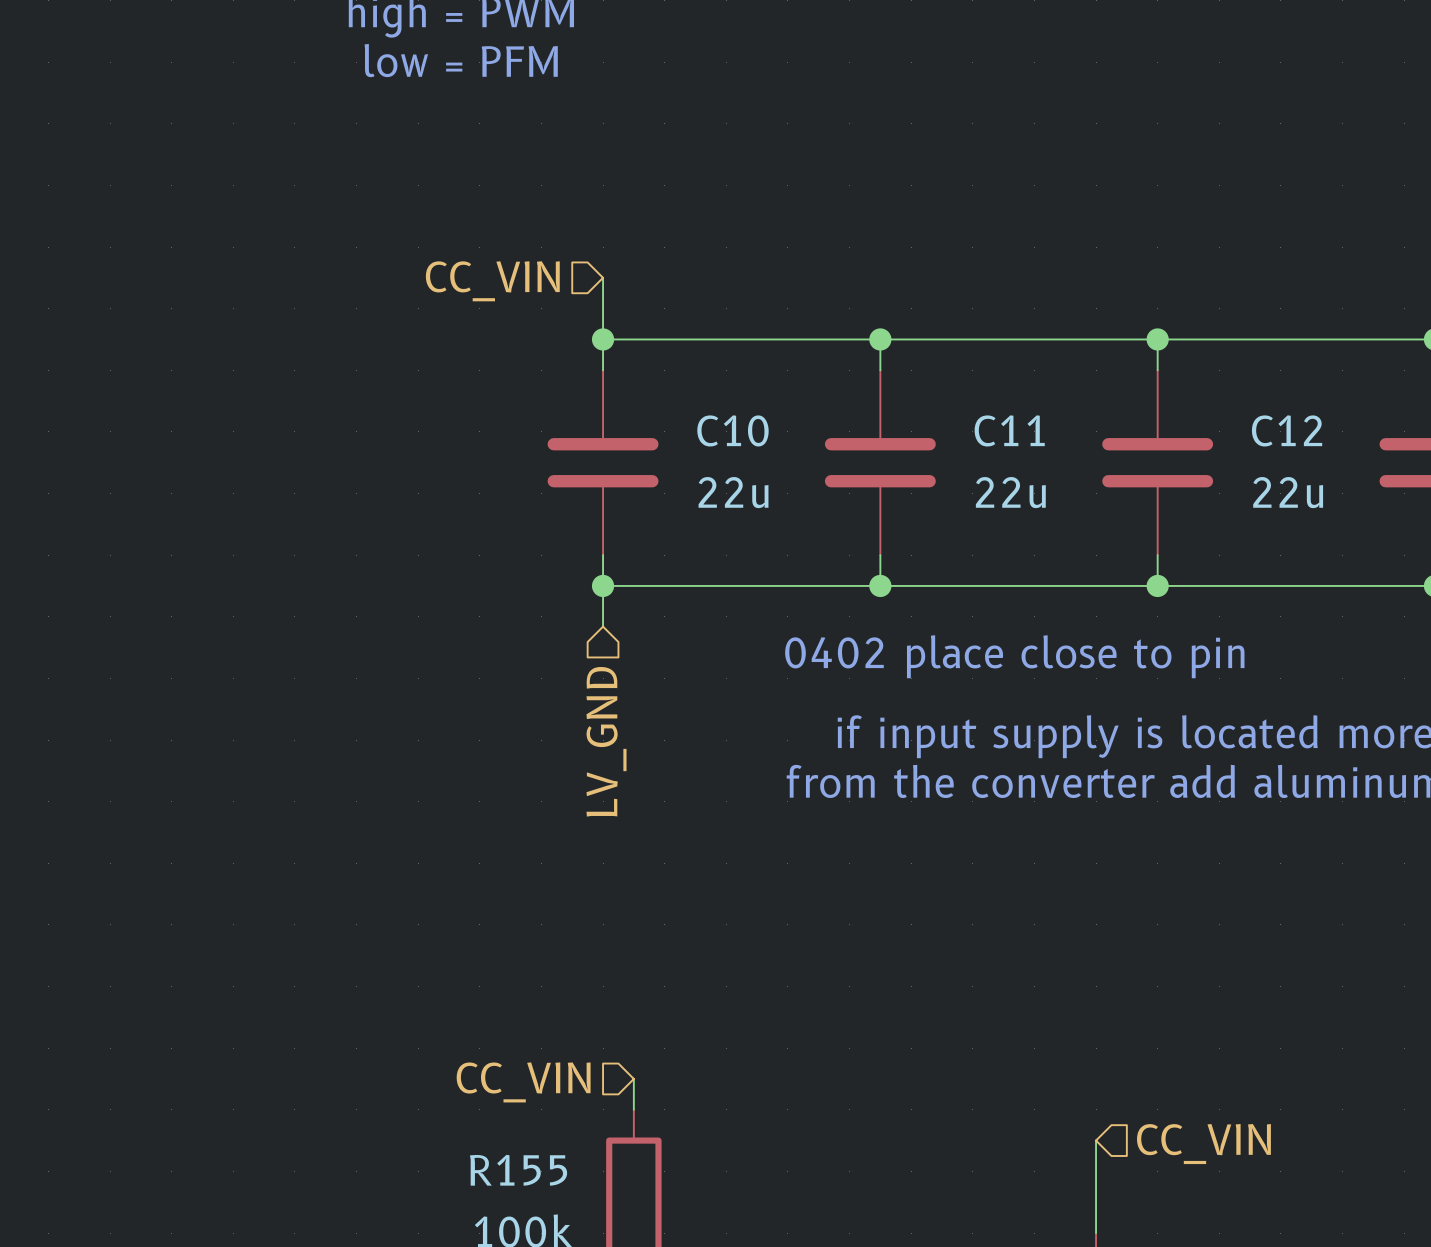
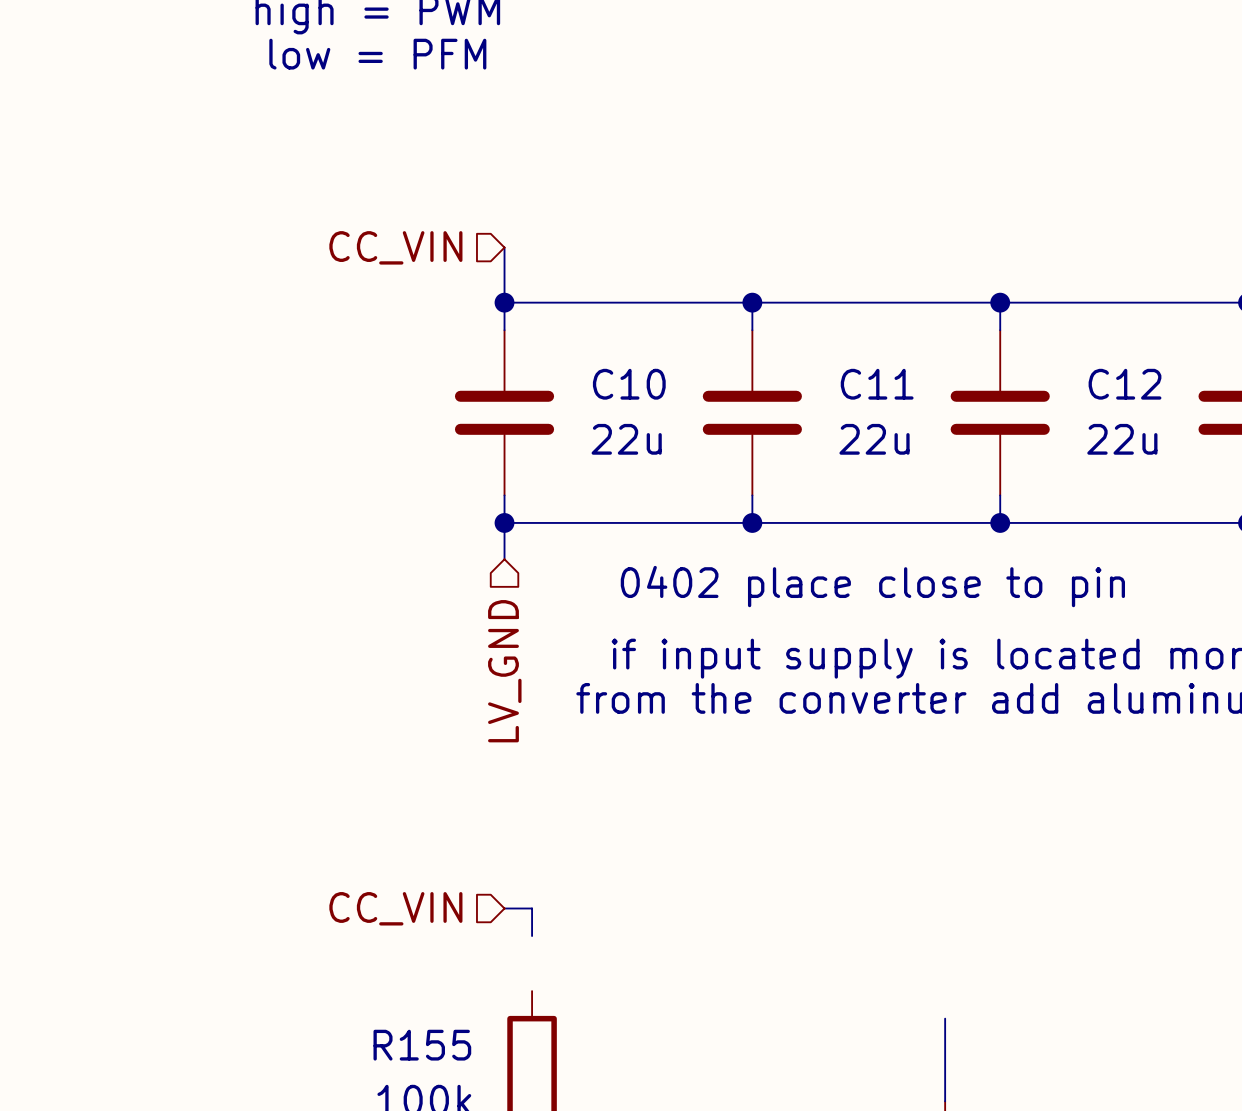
wire: none -> (504, 908) (532, 908) (532, 936)
wire: (633, 1078) (633, 1109) -> none
hierarchical label position: CC_VIN (523, 1082) -> CC_VIN (395, 908)
hierarchical label: CC_VIN (1203, 1144) -> none

